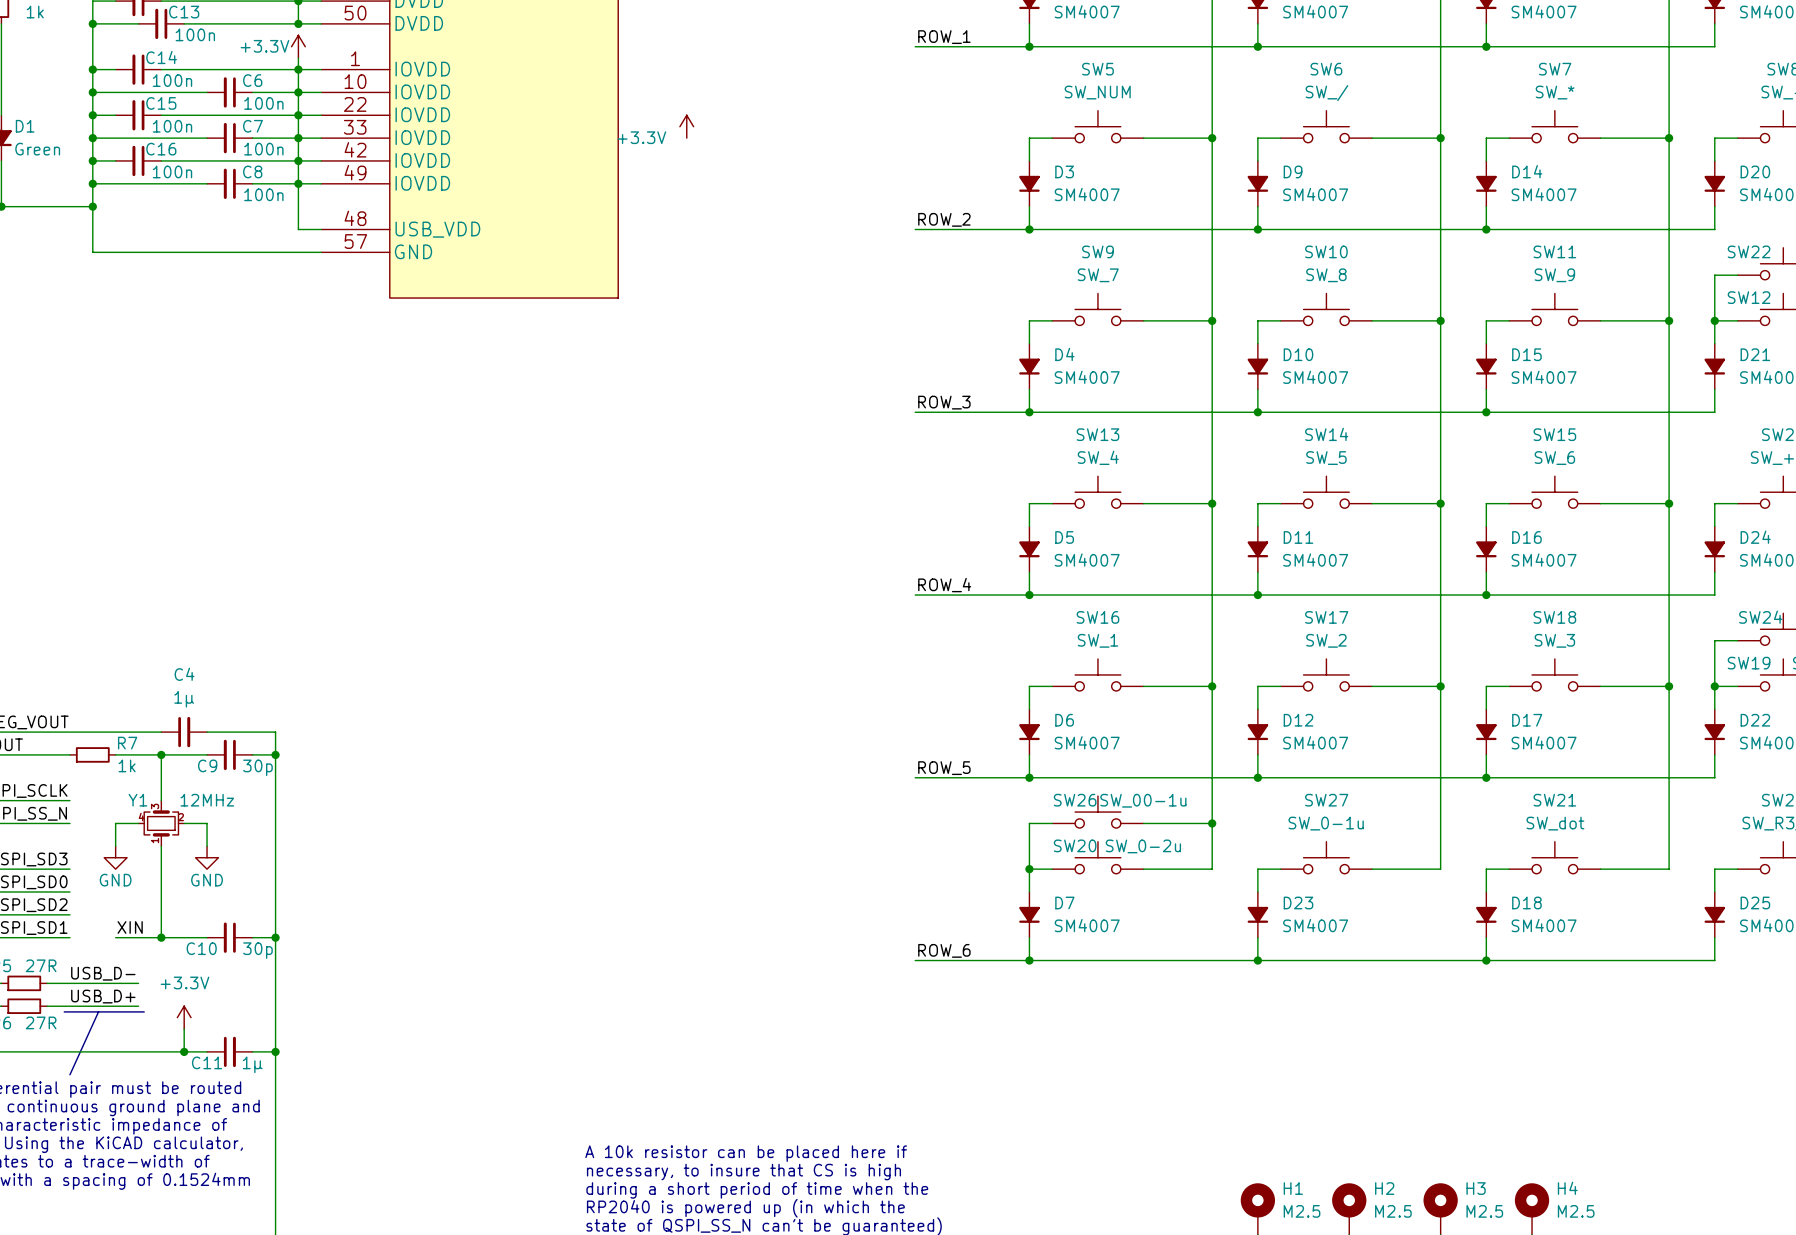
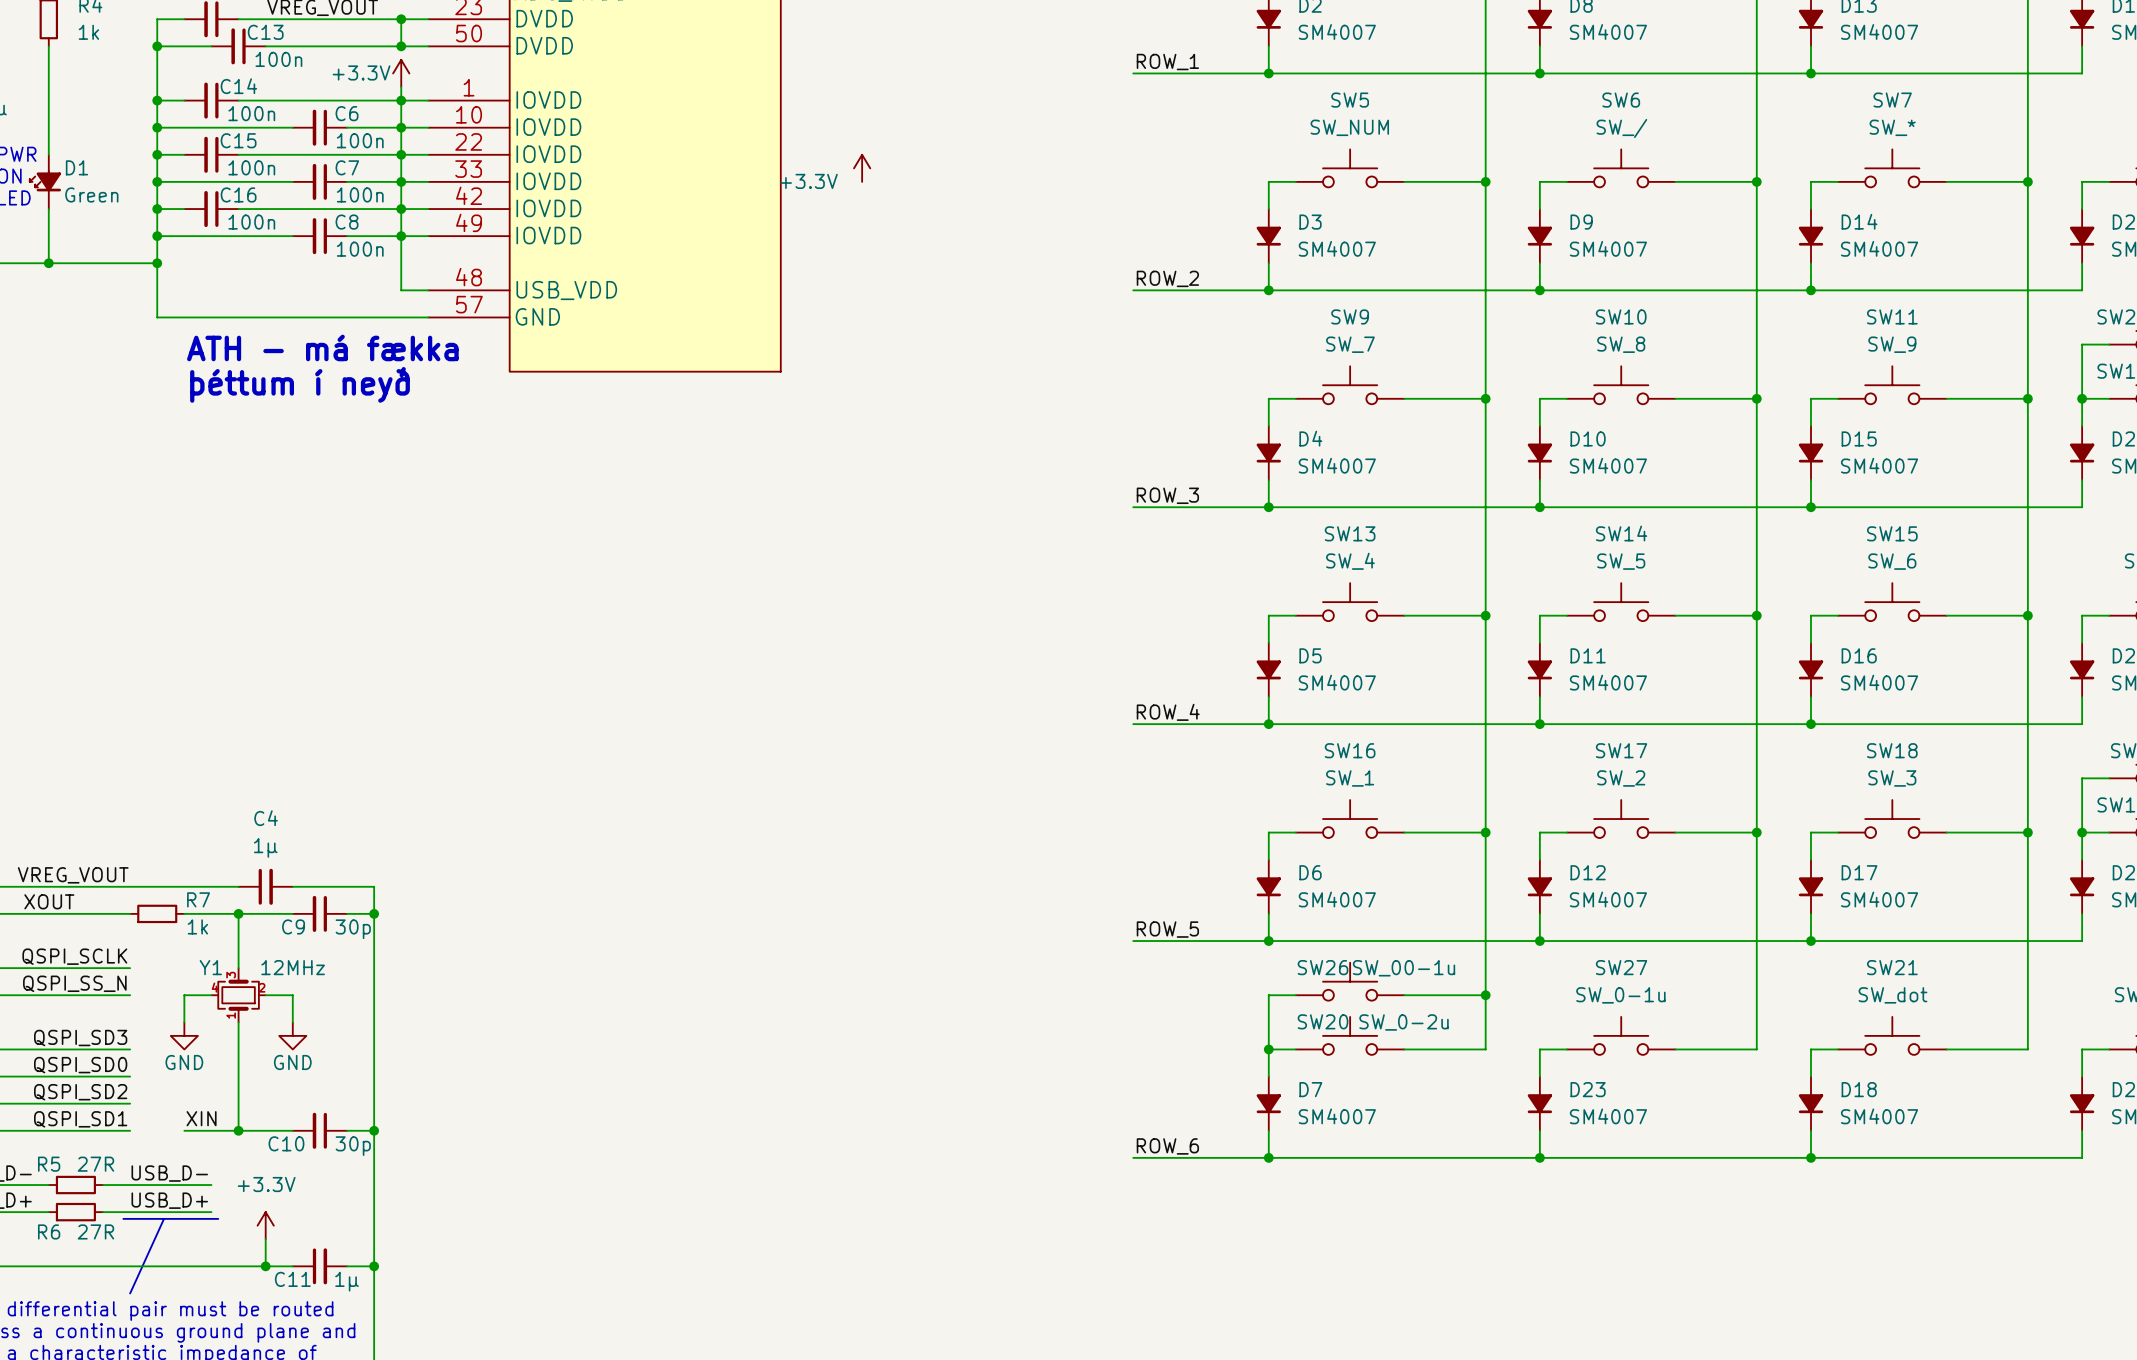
text: none -> ATH - má fækka (322, 347)
text: none -> þéttum í neyð (300, 384)

